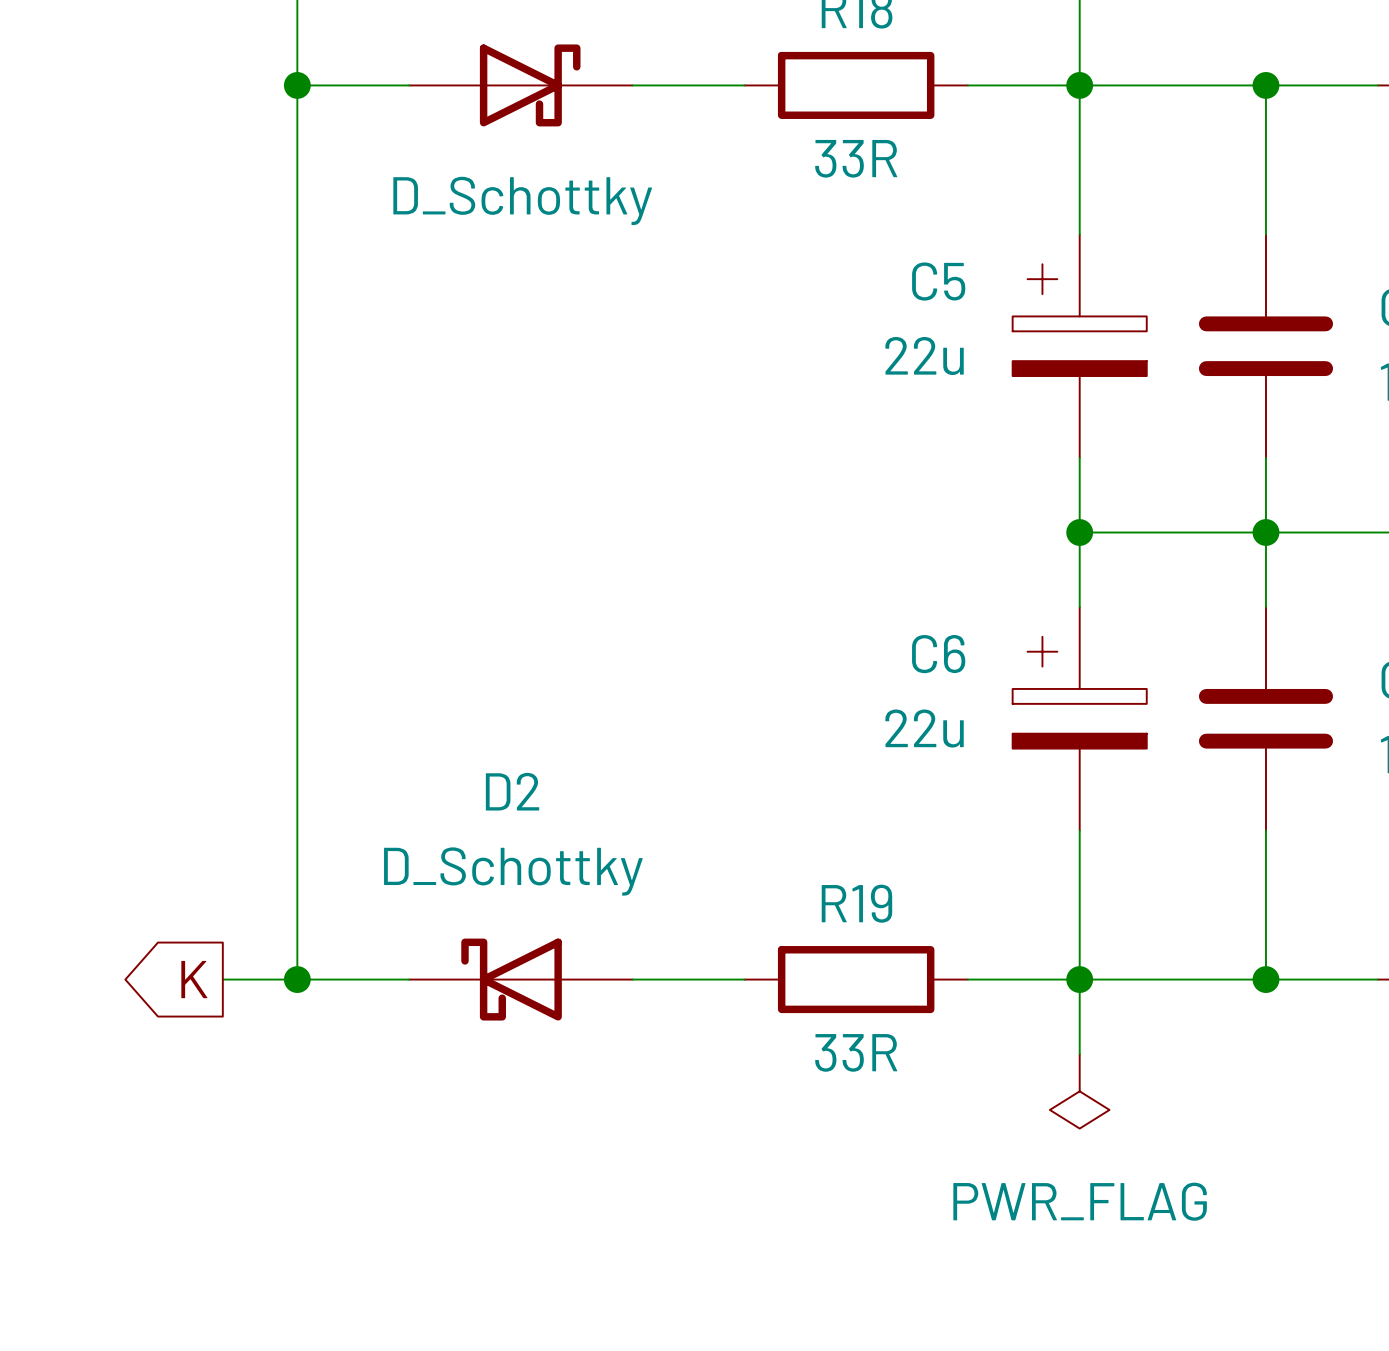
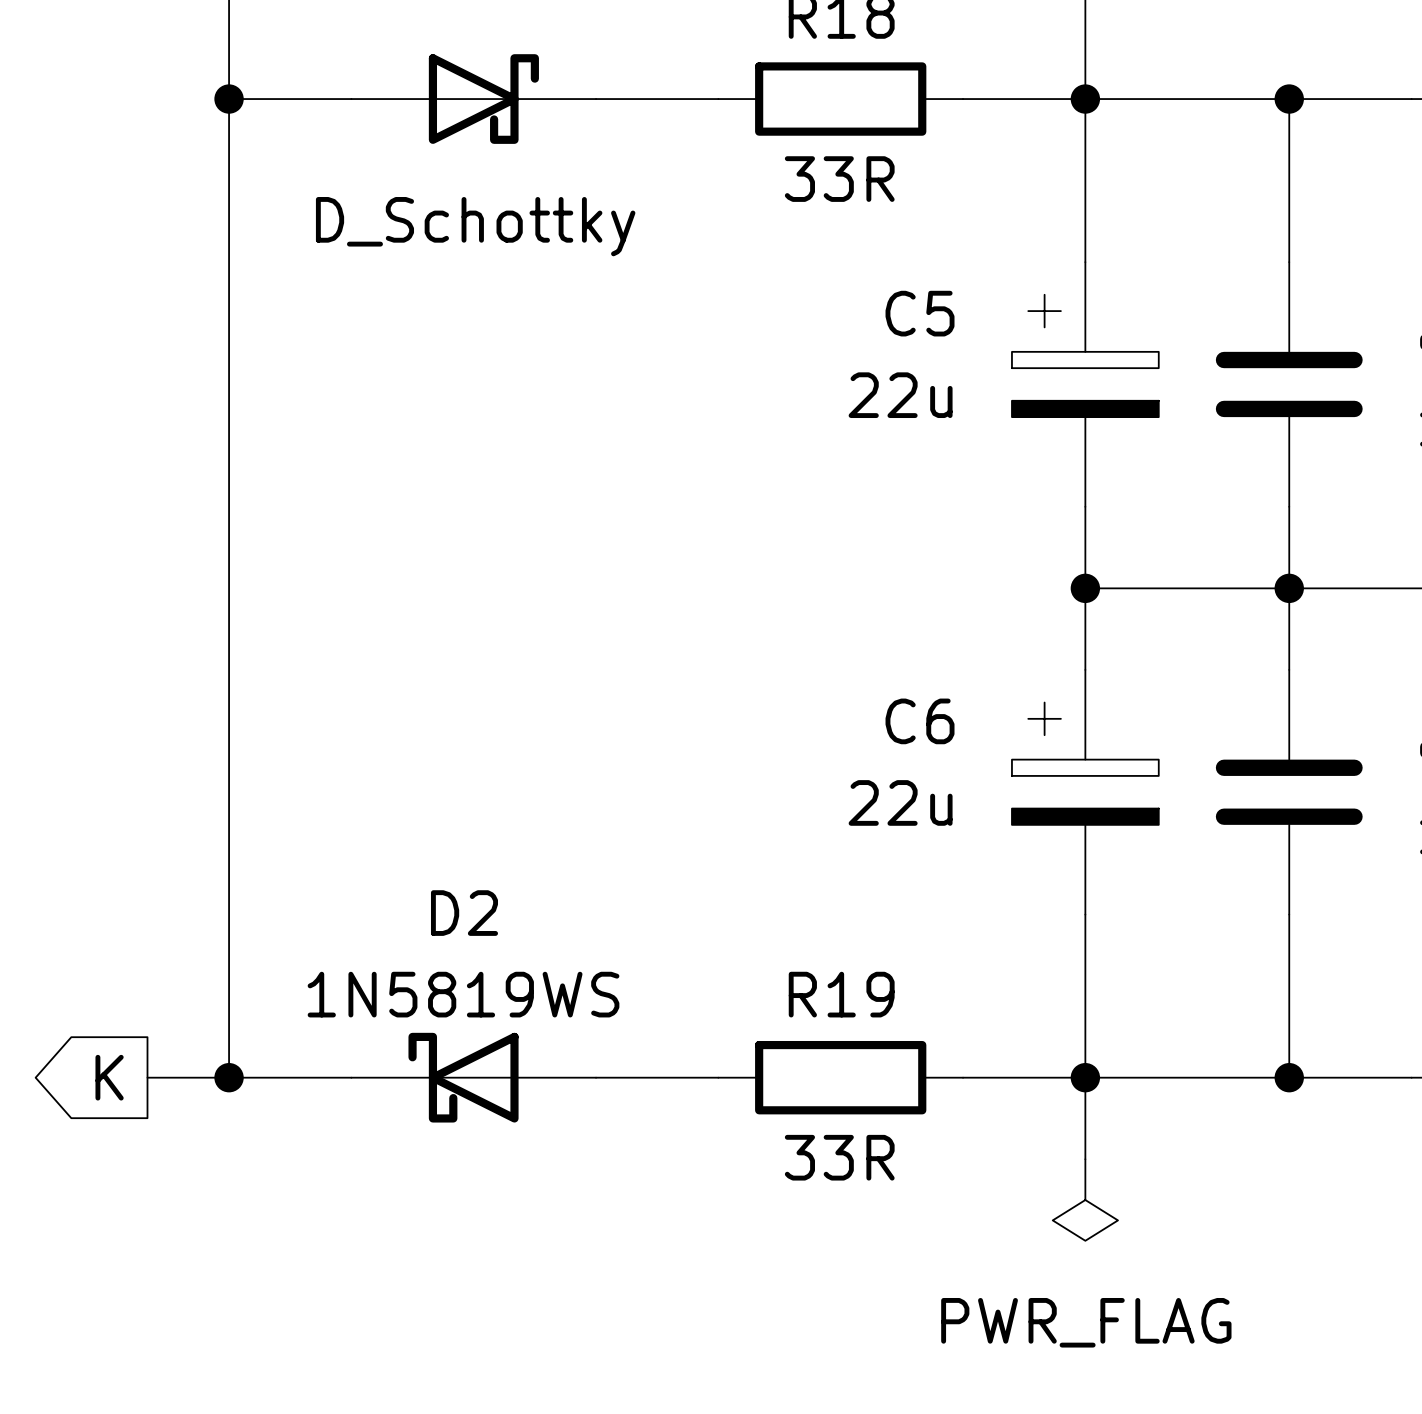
D2 name position: D2 (512, 791) -> D2 (464, 913)
D2 value: D_Schottky (513, 871) -> 1N5819WS (463, 994)

